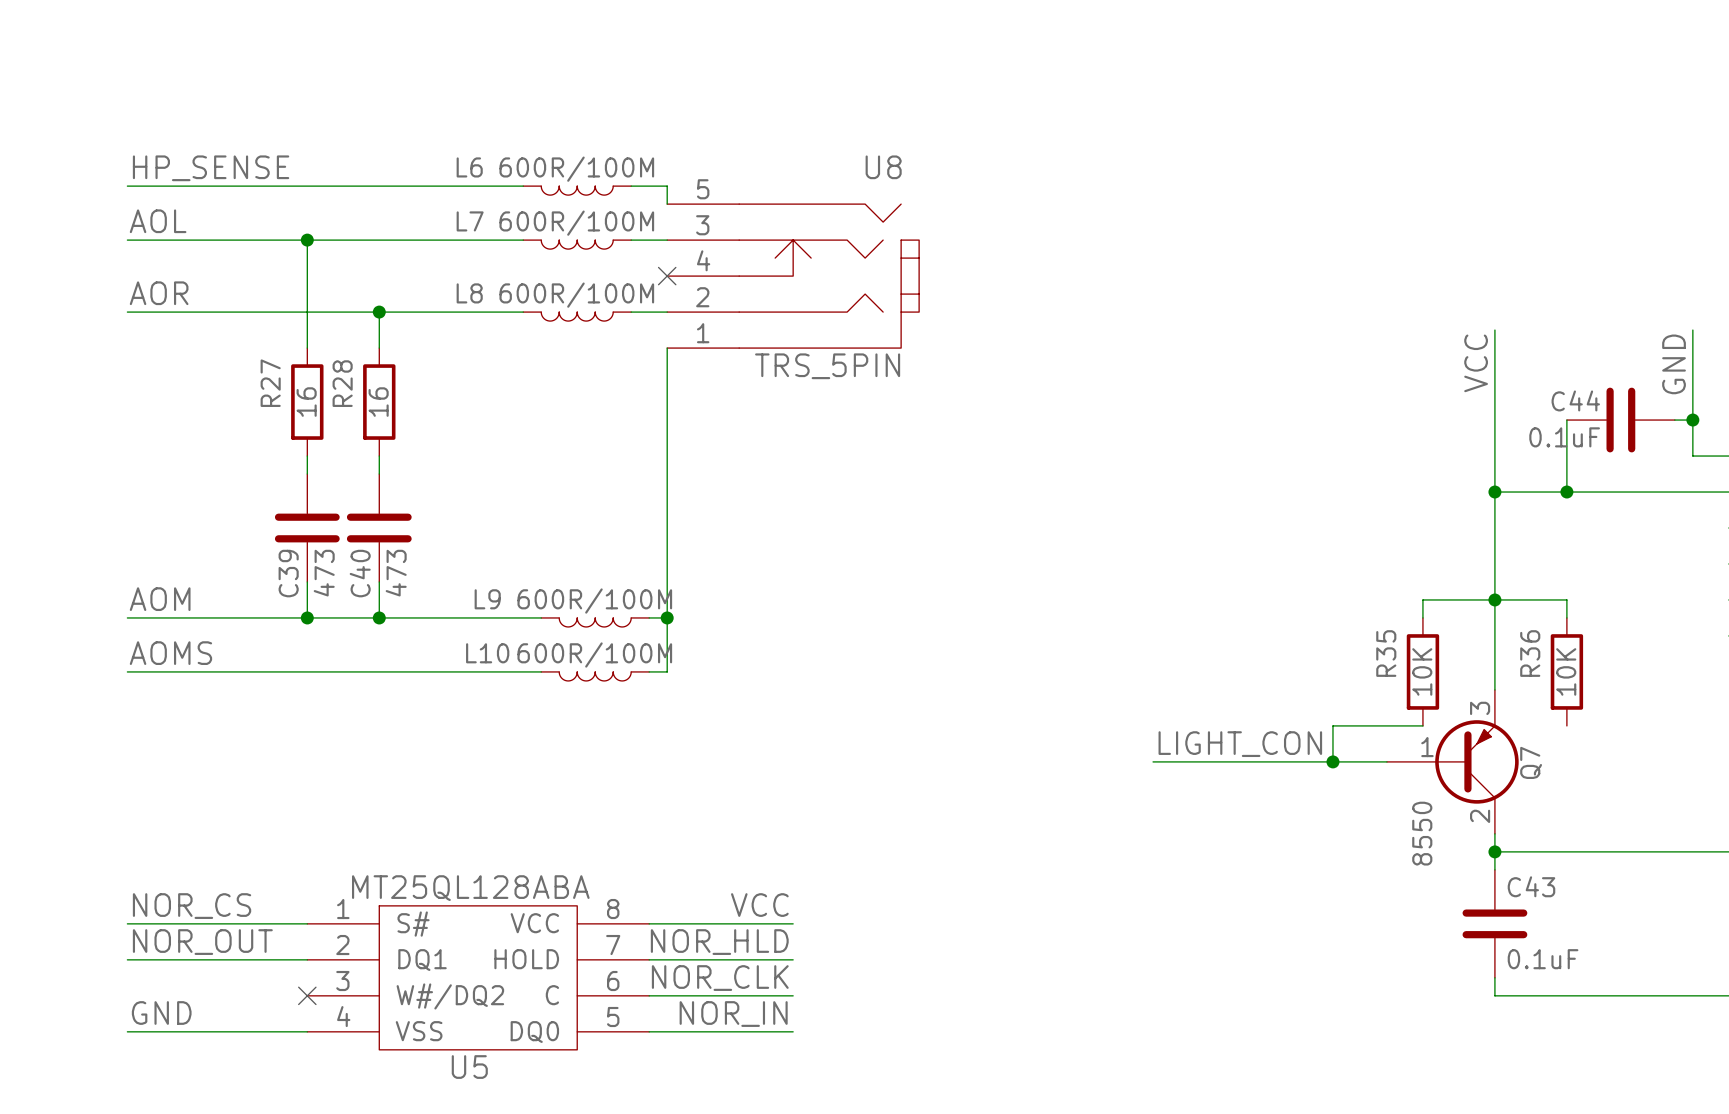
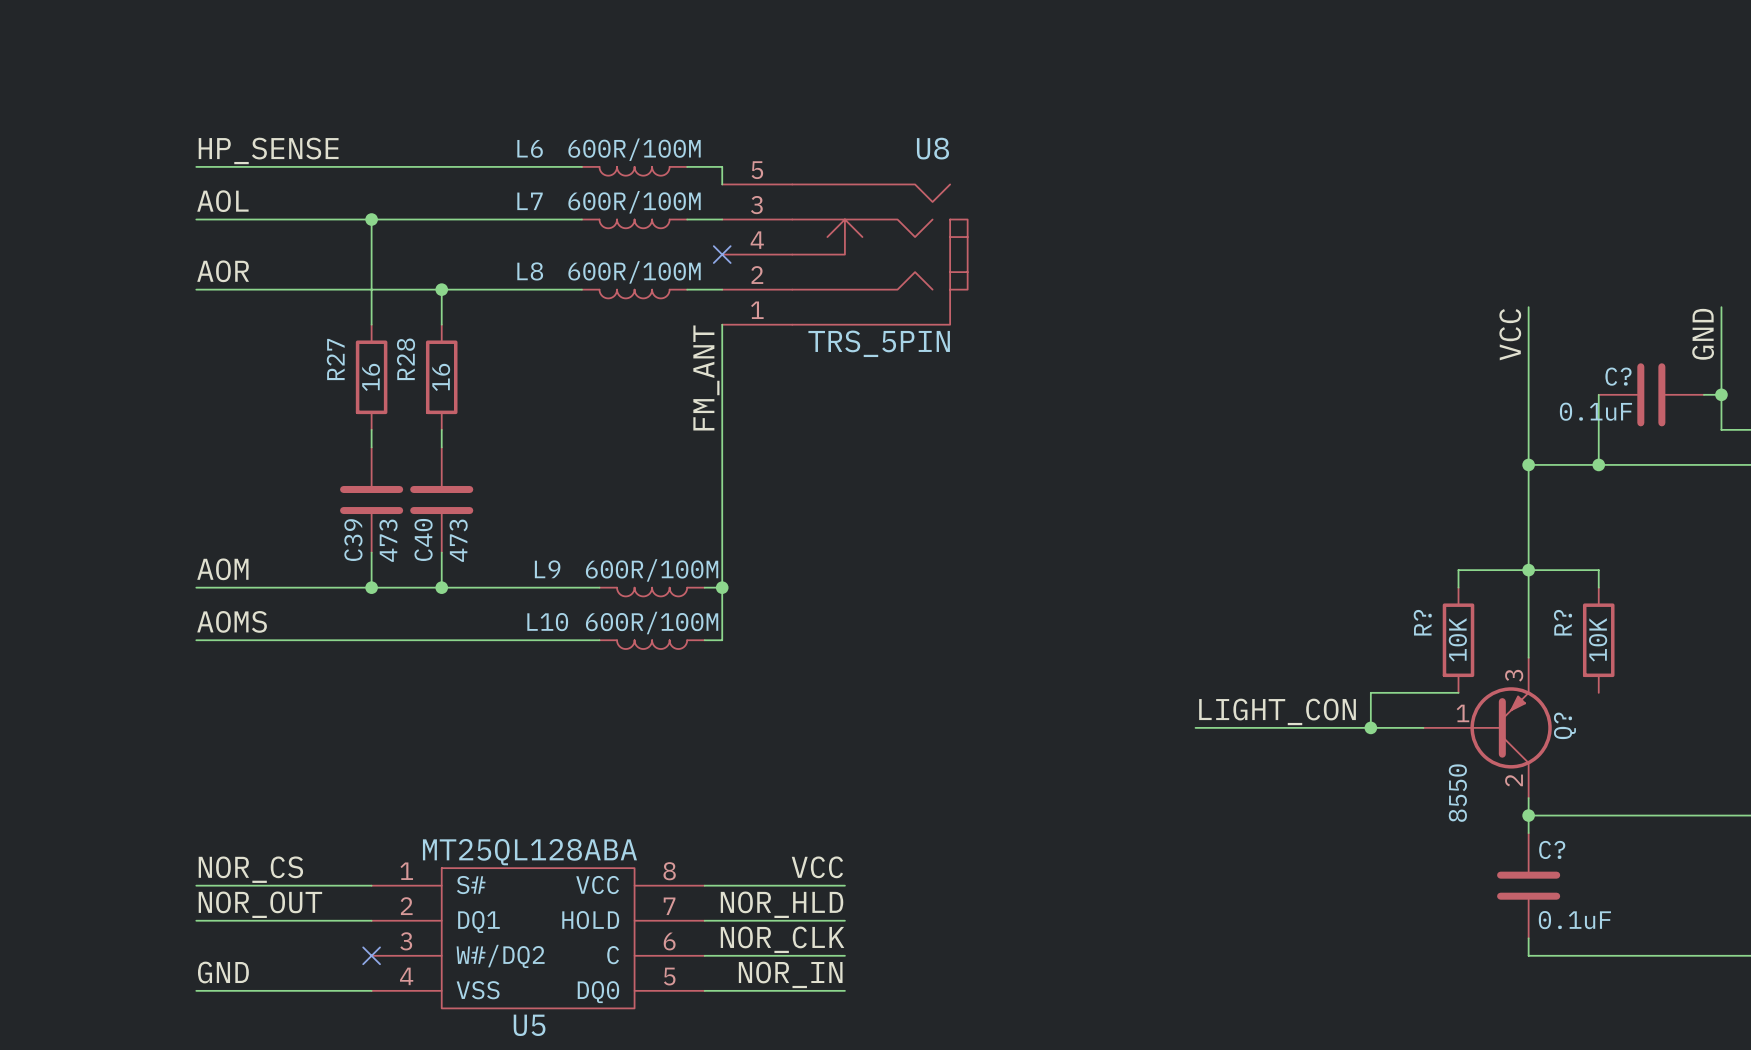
C44 name: C44 (1575, 400) -> C? (1618, 376)
label: none -> FM_ANT (706, 377)
R35 name: R35 (1386, 653) -> R? (1422, 622)
R36 name: R36 (1530, 653) -> R? (1562, 622)
Q7 name: Q7 (1531, 762) -> Q? (1564, 725)
C43 name: C43 (1531, 886) -> C? (1552, 849)

